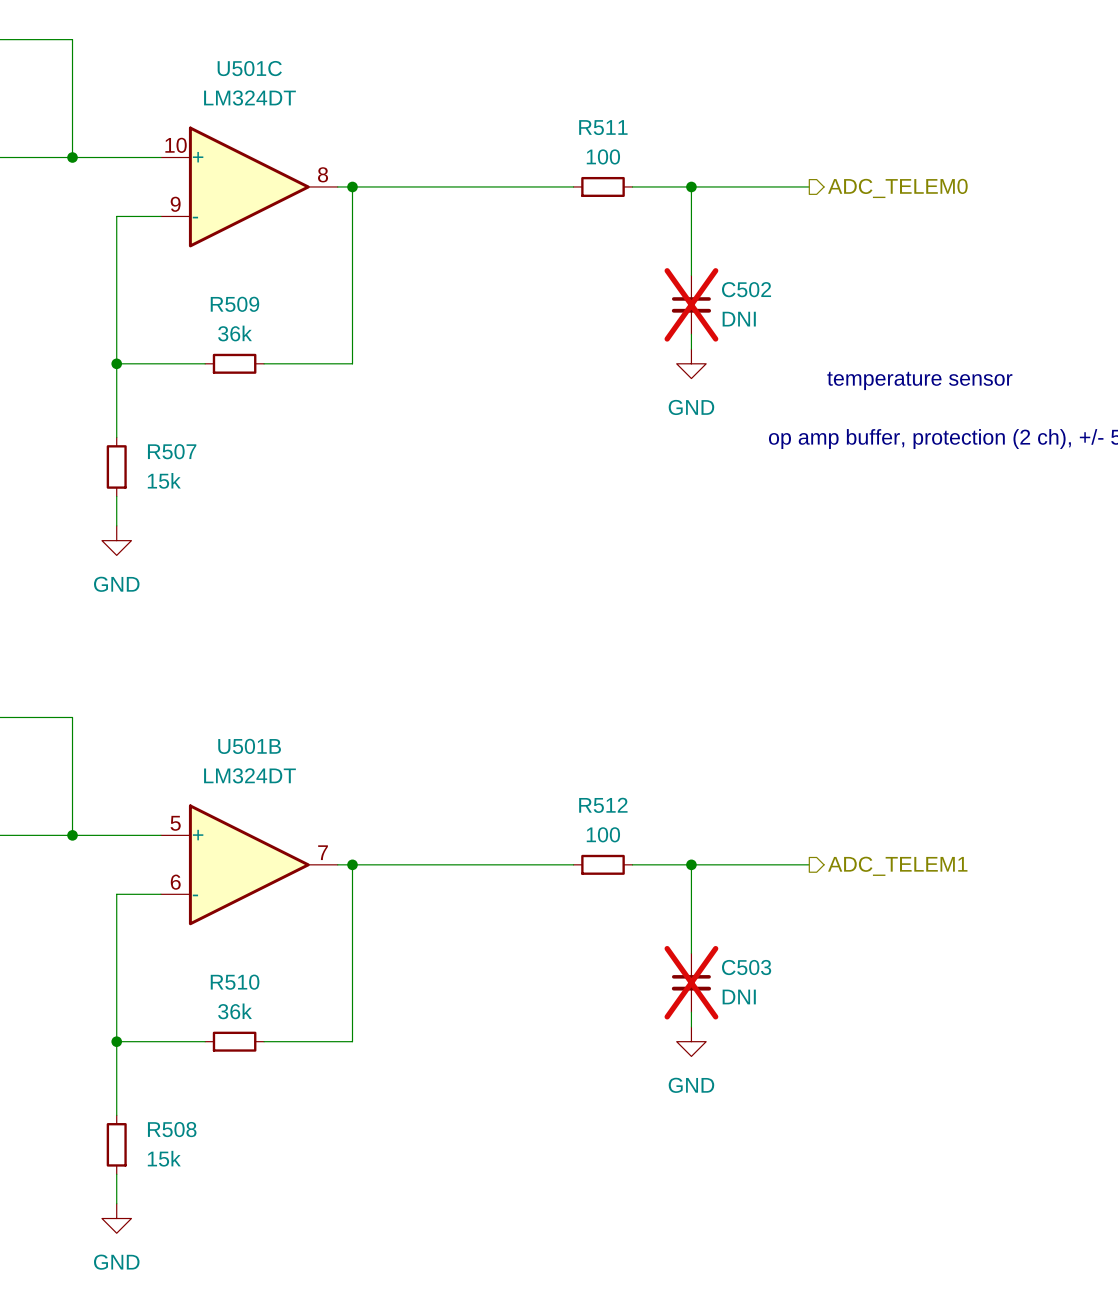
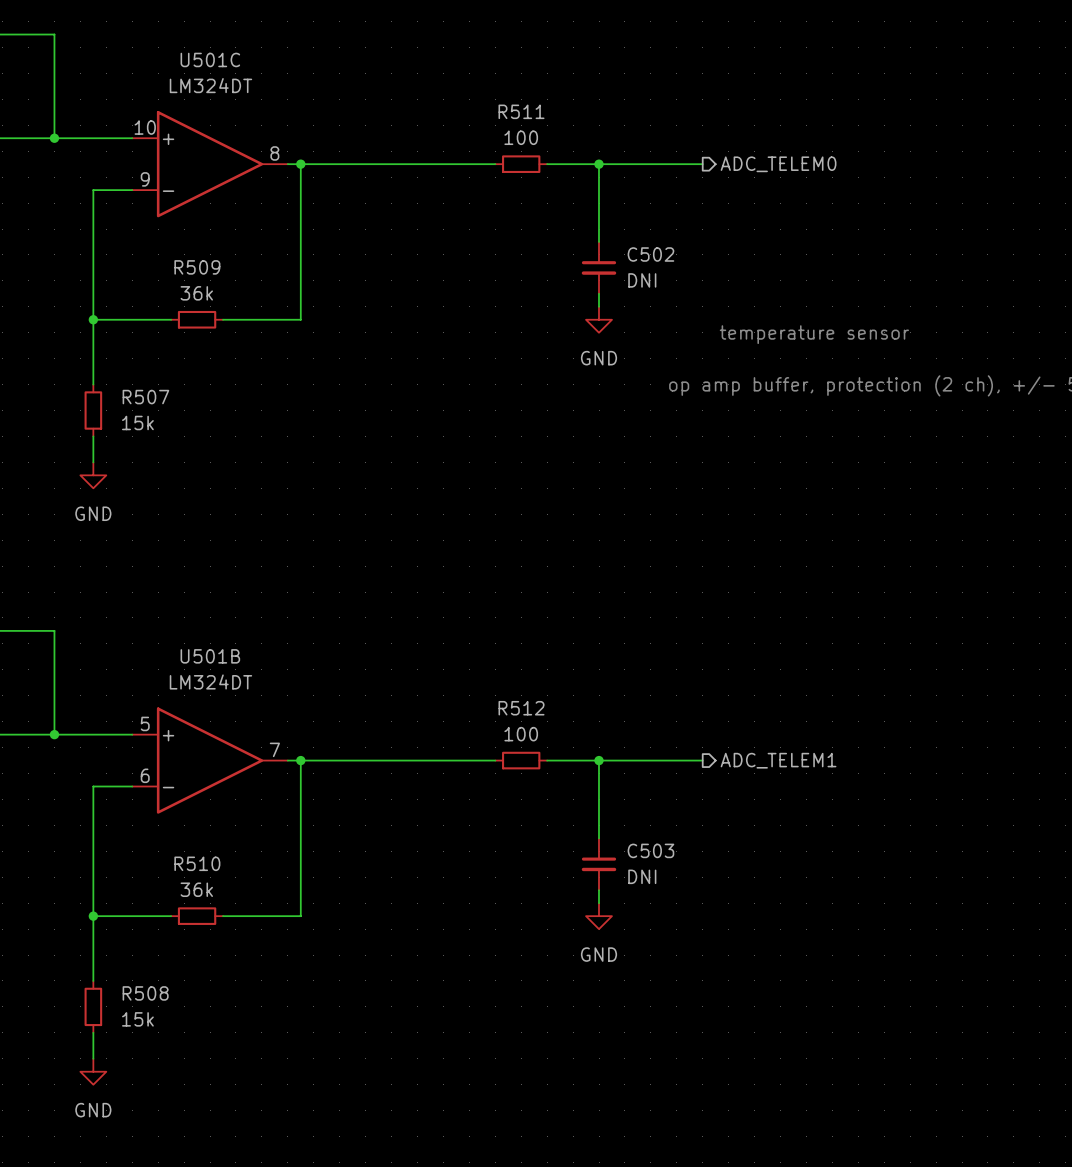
C502 do-not-place cross: (691, 304) -> none
C503 do-not-place cross: (691, 982) -> none

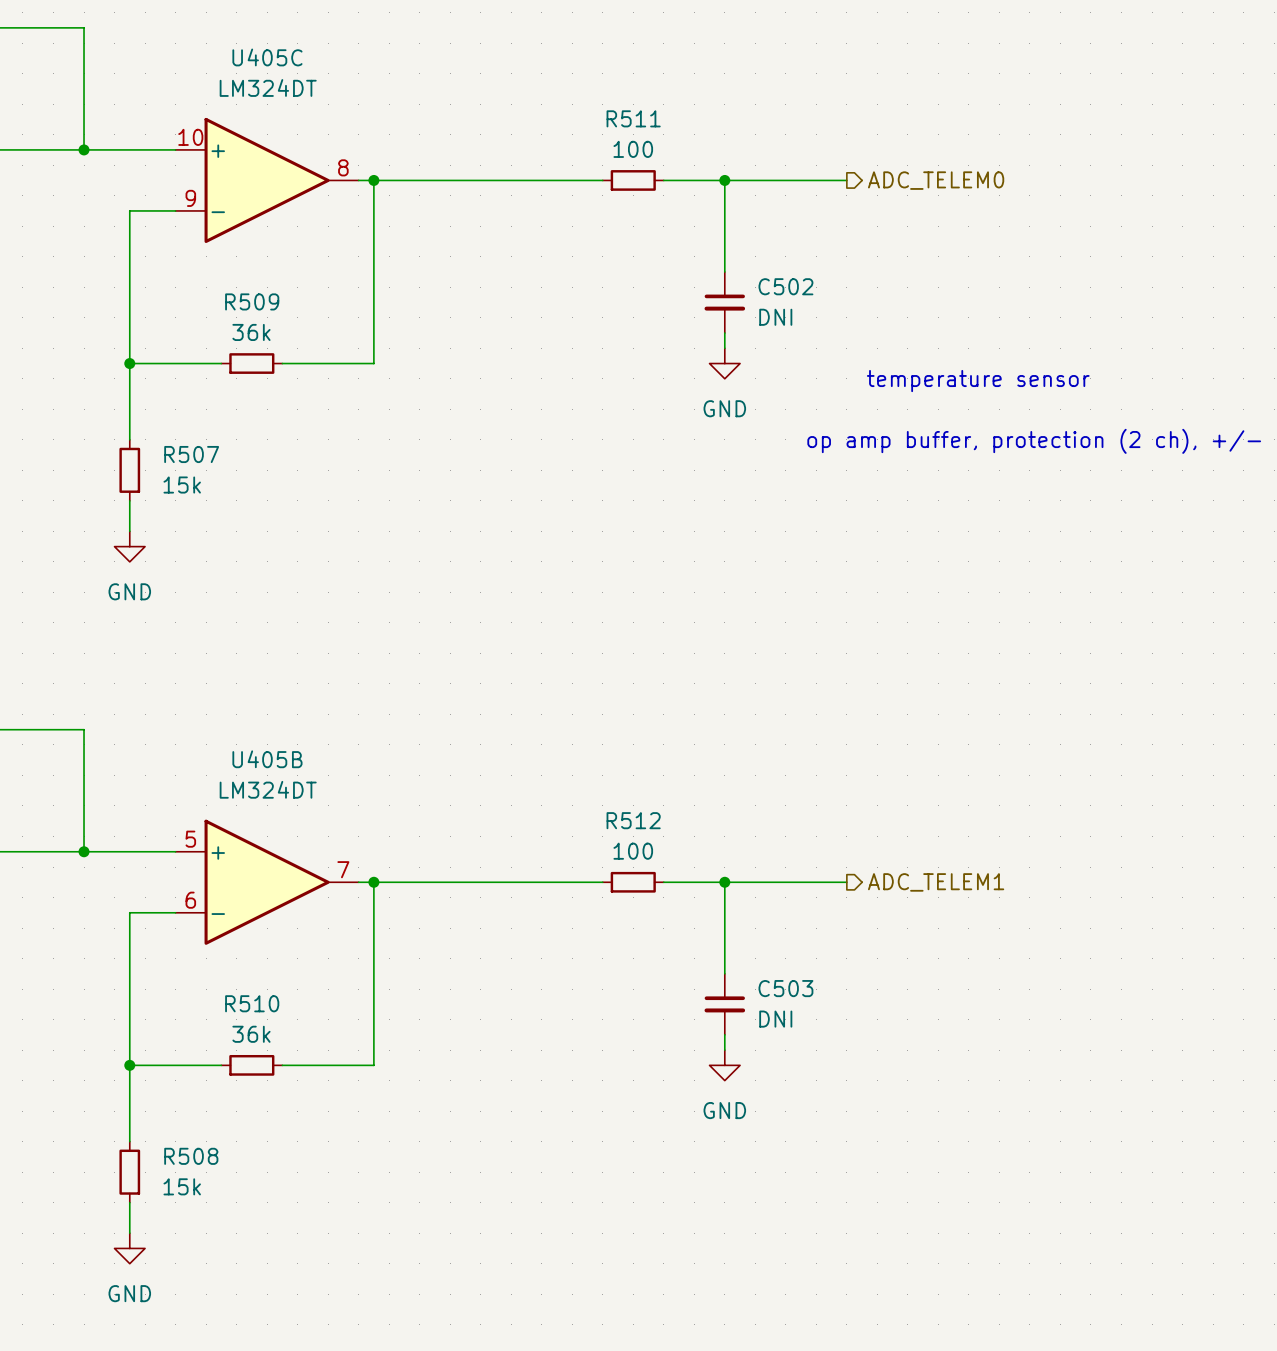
U501C name: U501C (210, 59) -> U405C (267, 57)
U501B name: U501B (210, 656) -> U405B (267, 759)

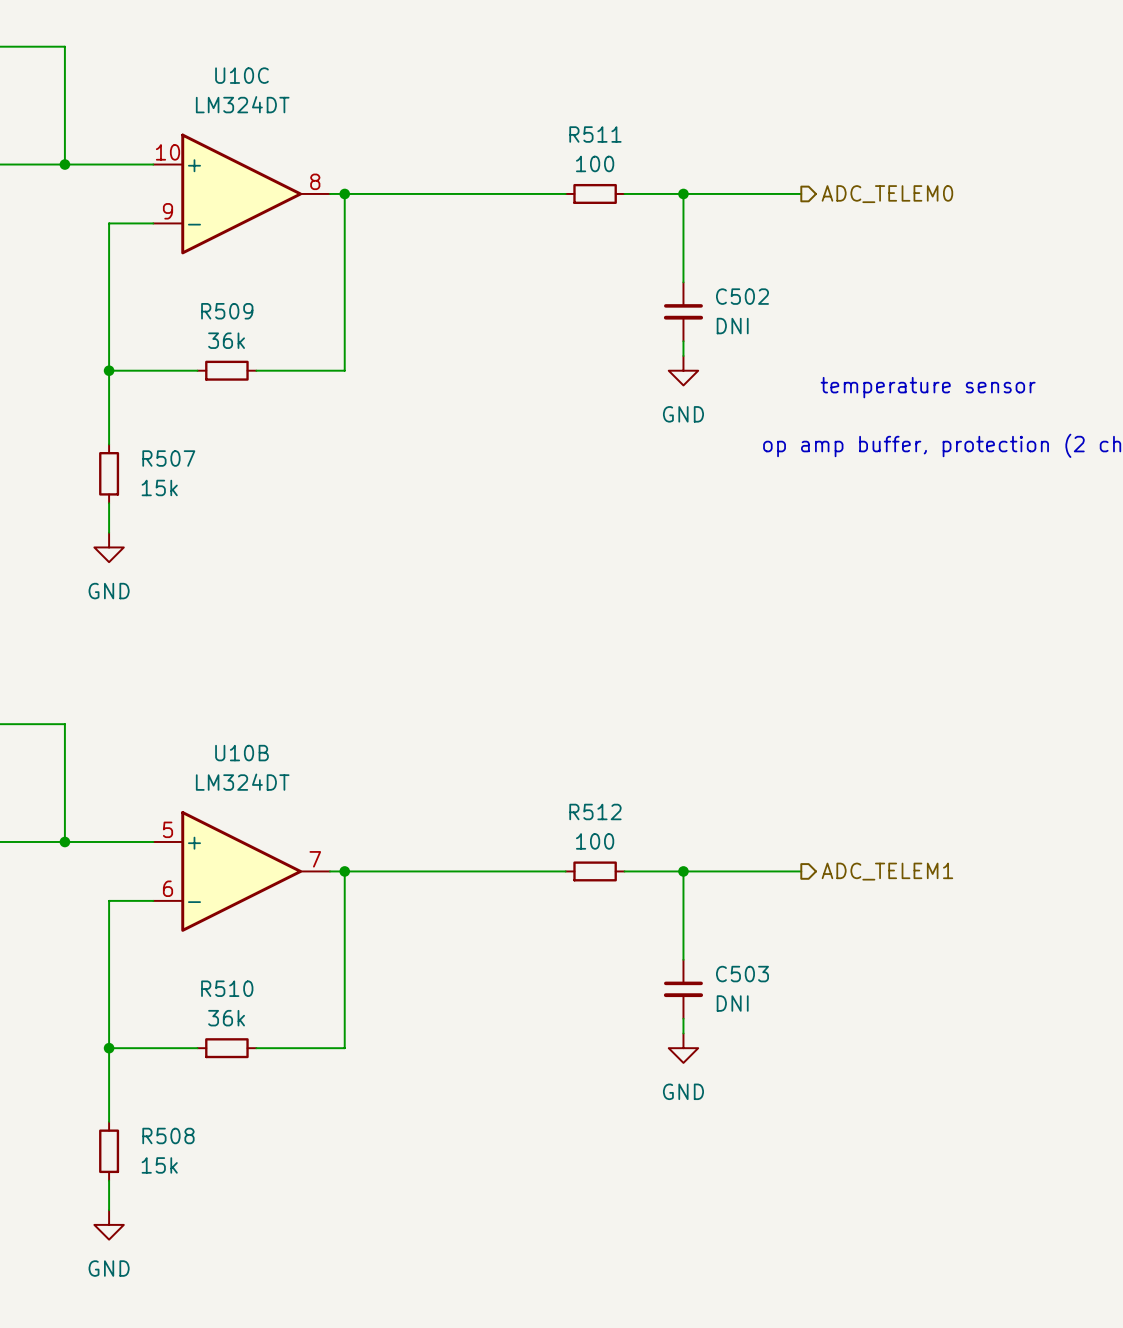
U405C name: U405C (267, 57) -> U10C (241, 75)
U405B name: U405B (267, 759) -> U10B (241, 753)

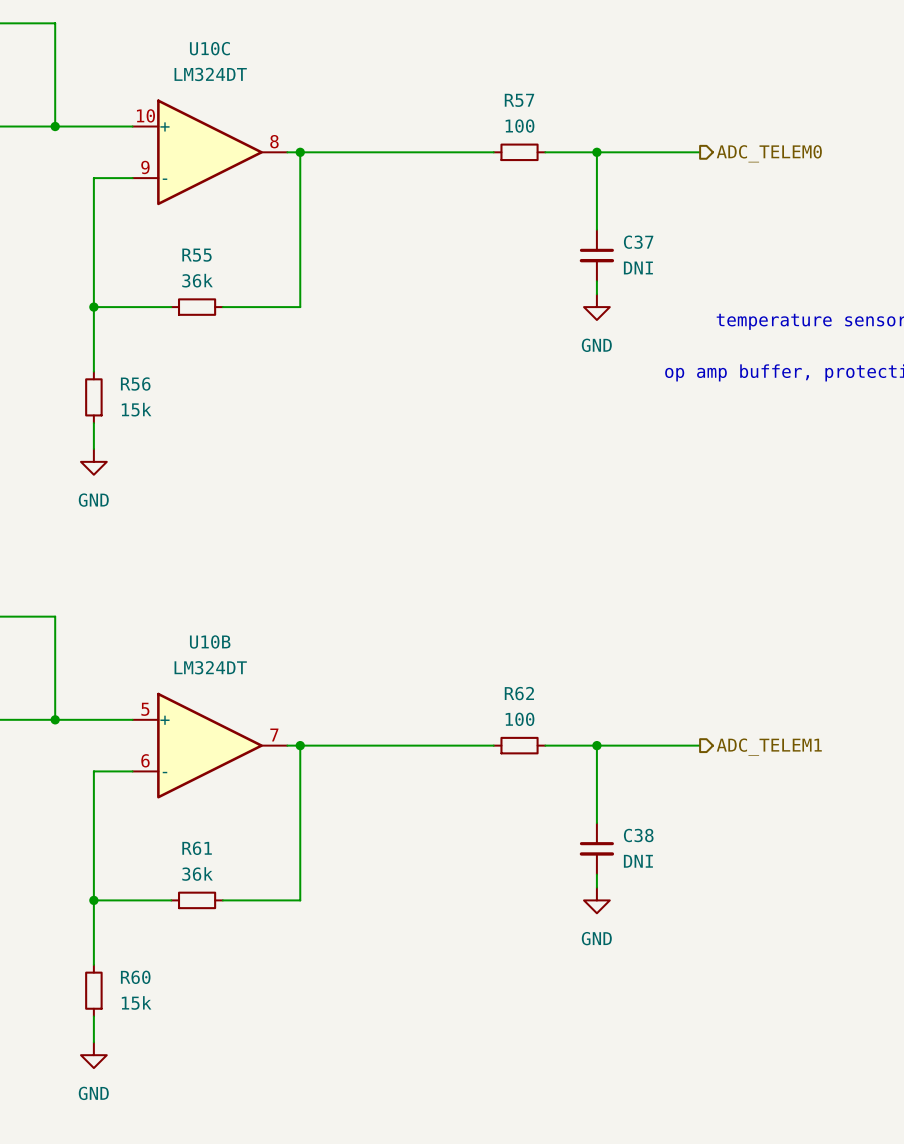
R511 name: R511 (595, 134) -> R57 (519, 100)
C502 name: C502 (742, 296) -> C37 (638, 242)
R509 name: R509 (227, 311) -> R55 (196, 255)
R507 name: R507 (168, 458) -> R56 (135, 384)
R512 name: R512 (595, 811) -> R62 (519, 693)
C503 name: C503 (742, 974) -> C38 (638, 835)
R510 name: R510 (227, 988) -> R61 (197, 848)
R508 name: R508 (168, 1135) -> R60 (135, 977)

